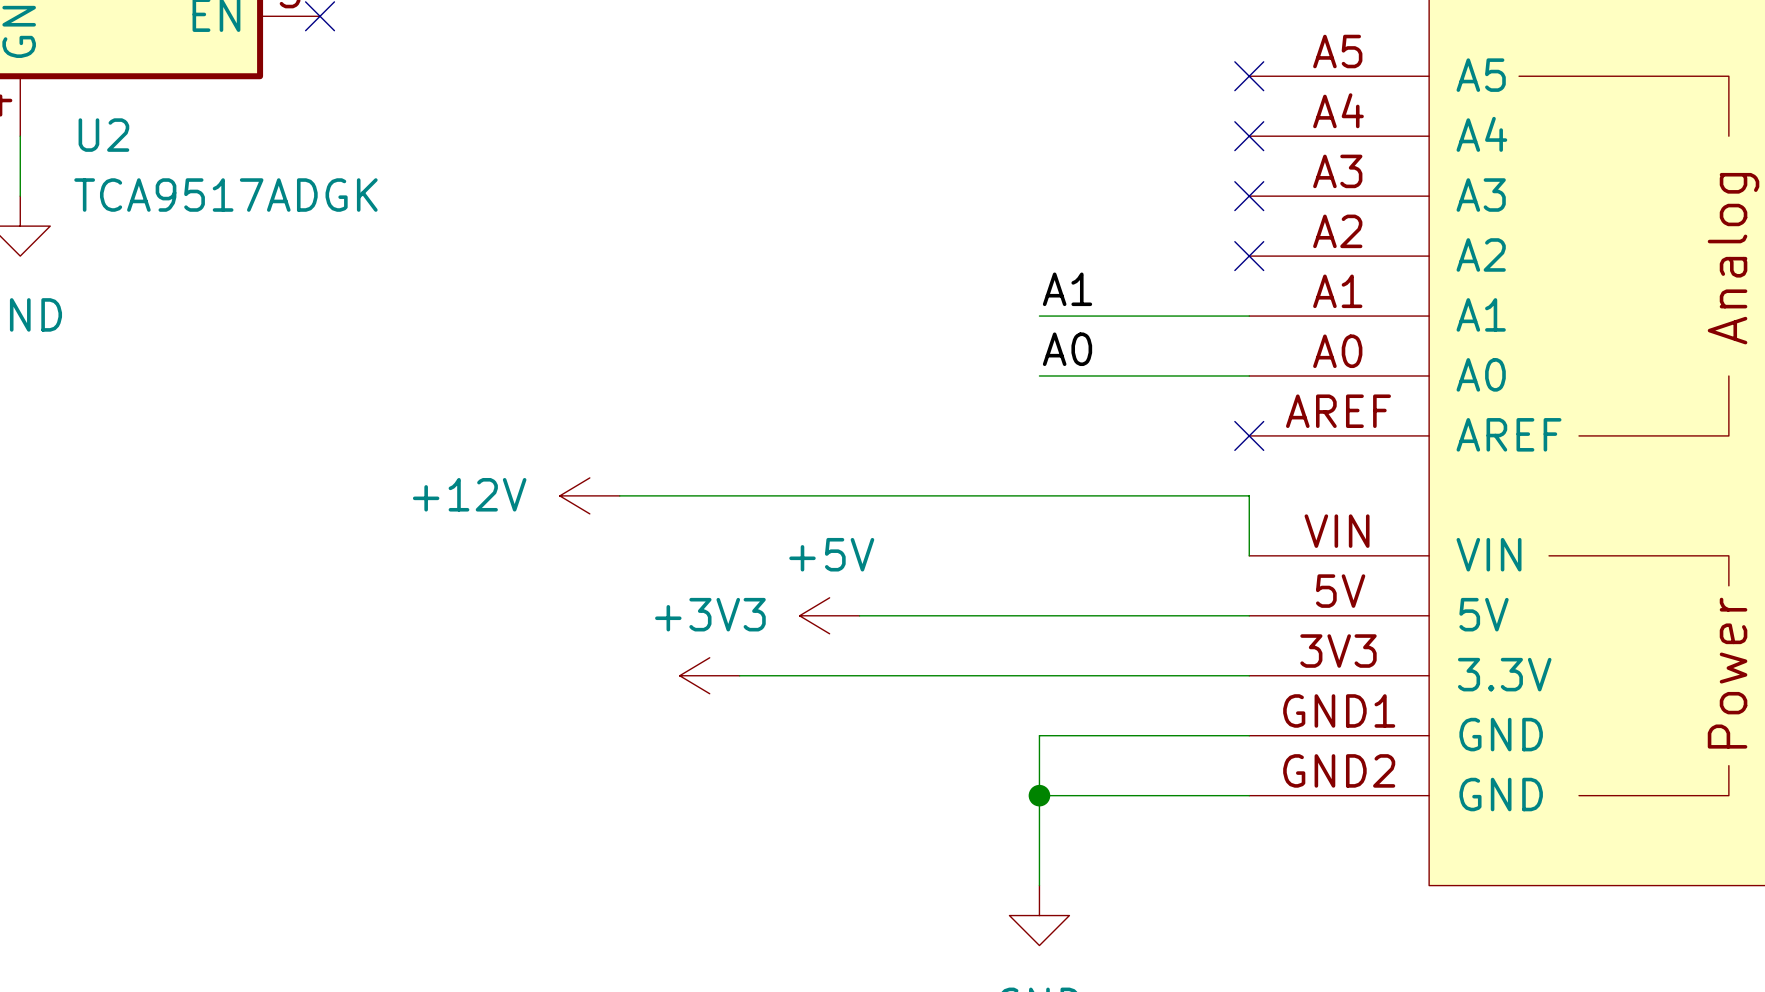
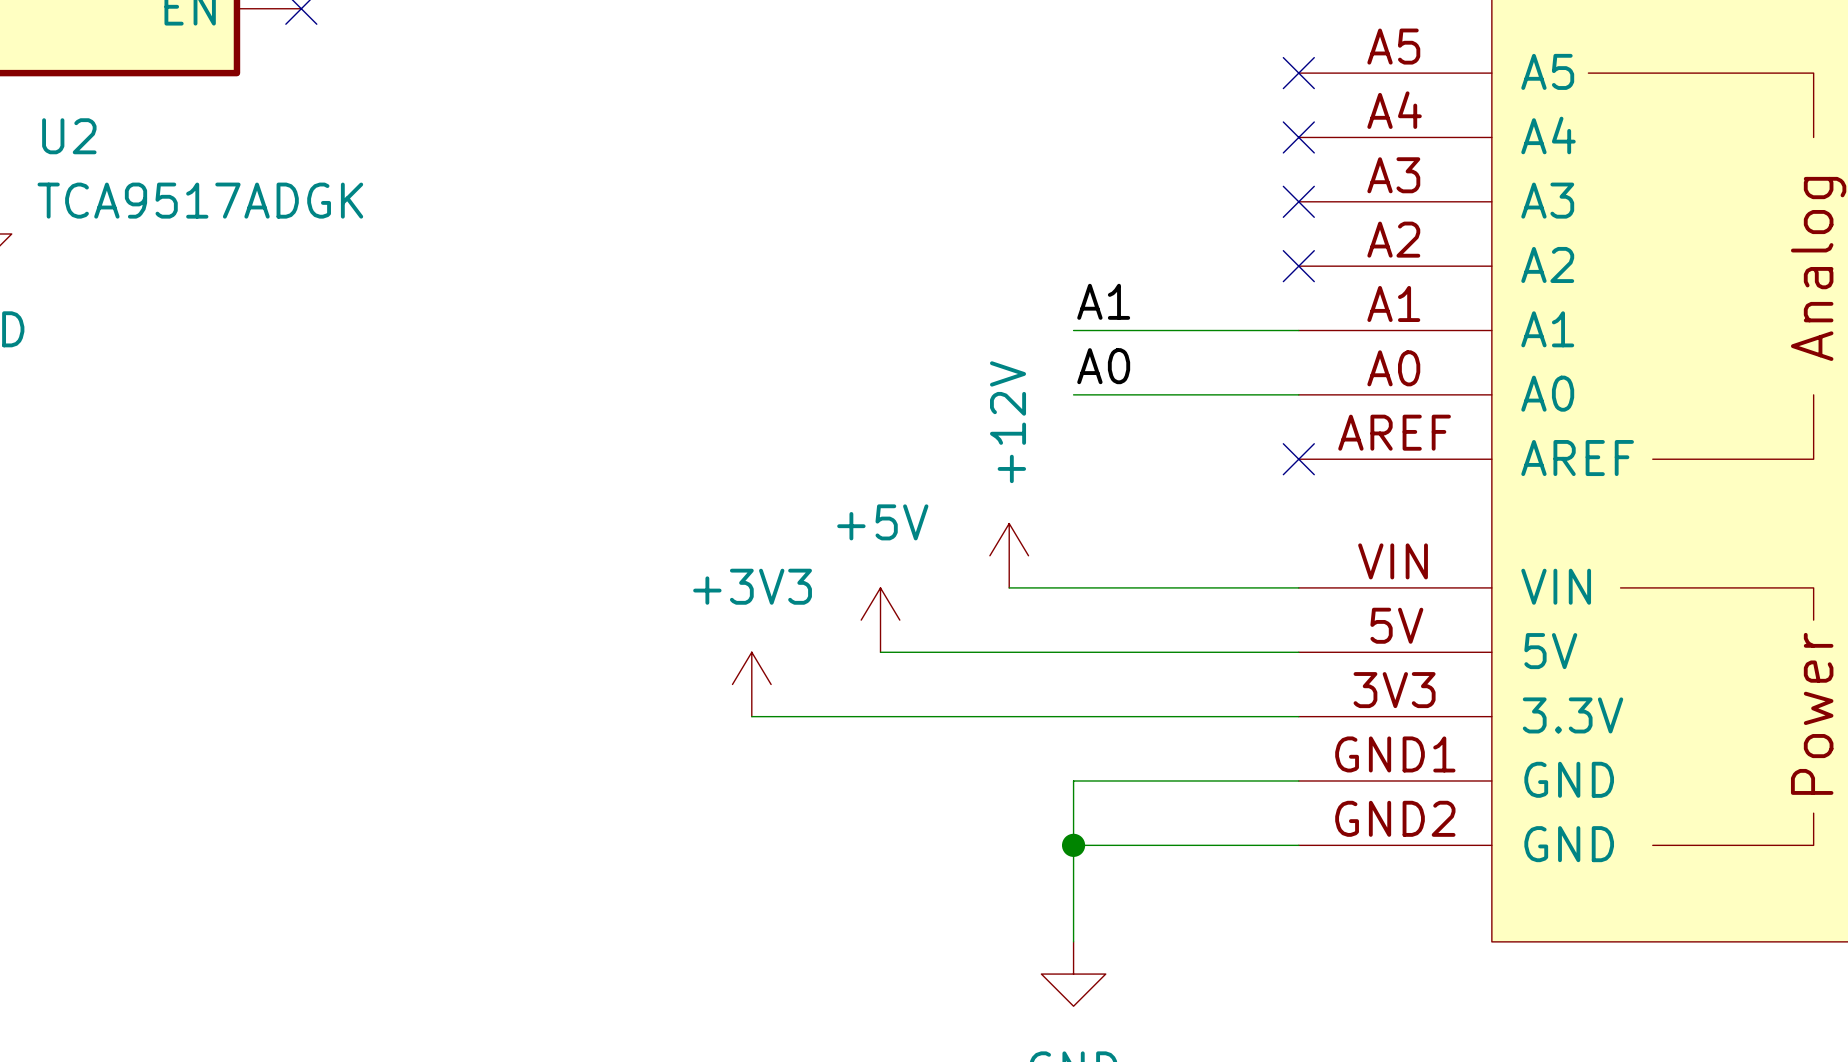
power symbol rotation: 0° (589, 495) -> 90° clockwise (1009, 555)
power symbol position: +12V (589, 495) -> +12V (1009, 555)
wire: (619, 495) (1249, 495) (1249, 555) -> (1009, 587) (1298, 587)
power symbol rotation: 0° (829, 615) -> 90° clockwise (880, 620)
power symbol position: +5V (829, 615) -> +5V (880, 620)
power symbol rotation: 0° (709, 675) -> 90° clockwise (751, 684)
power symbol position: +3V3 (709, 675) -> +3V3 (751, 684)

